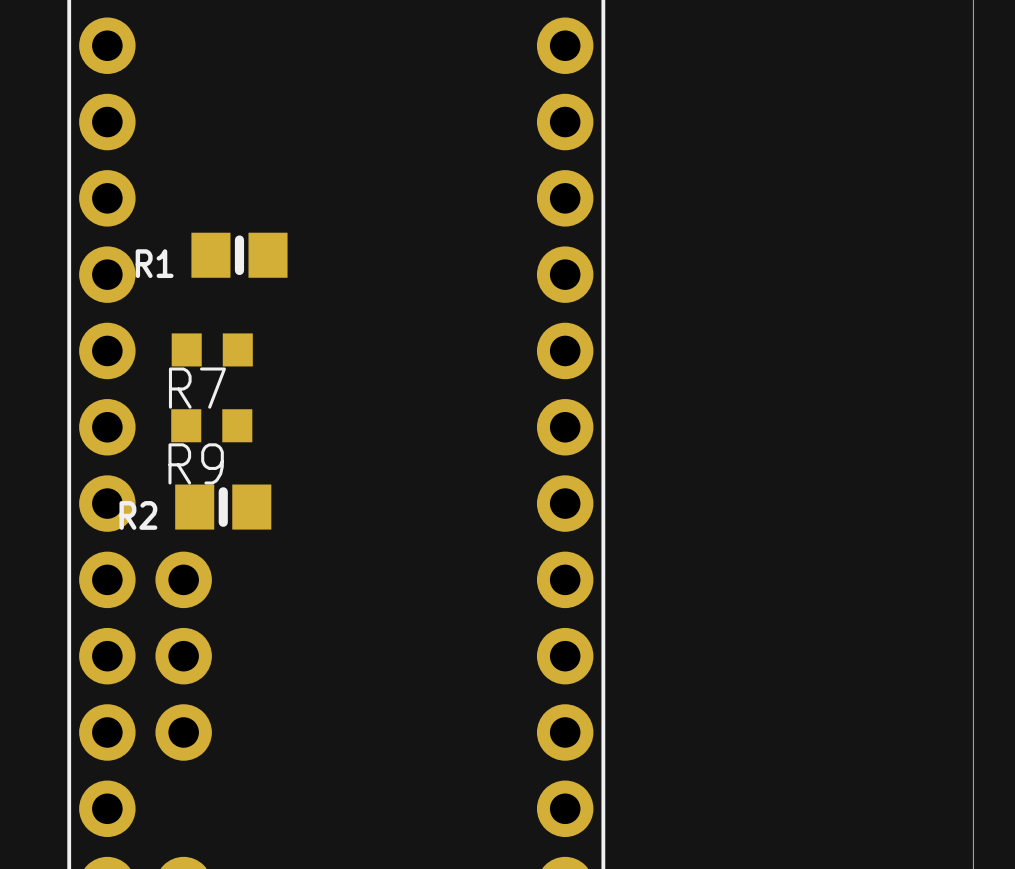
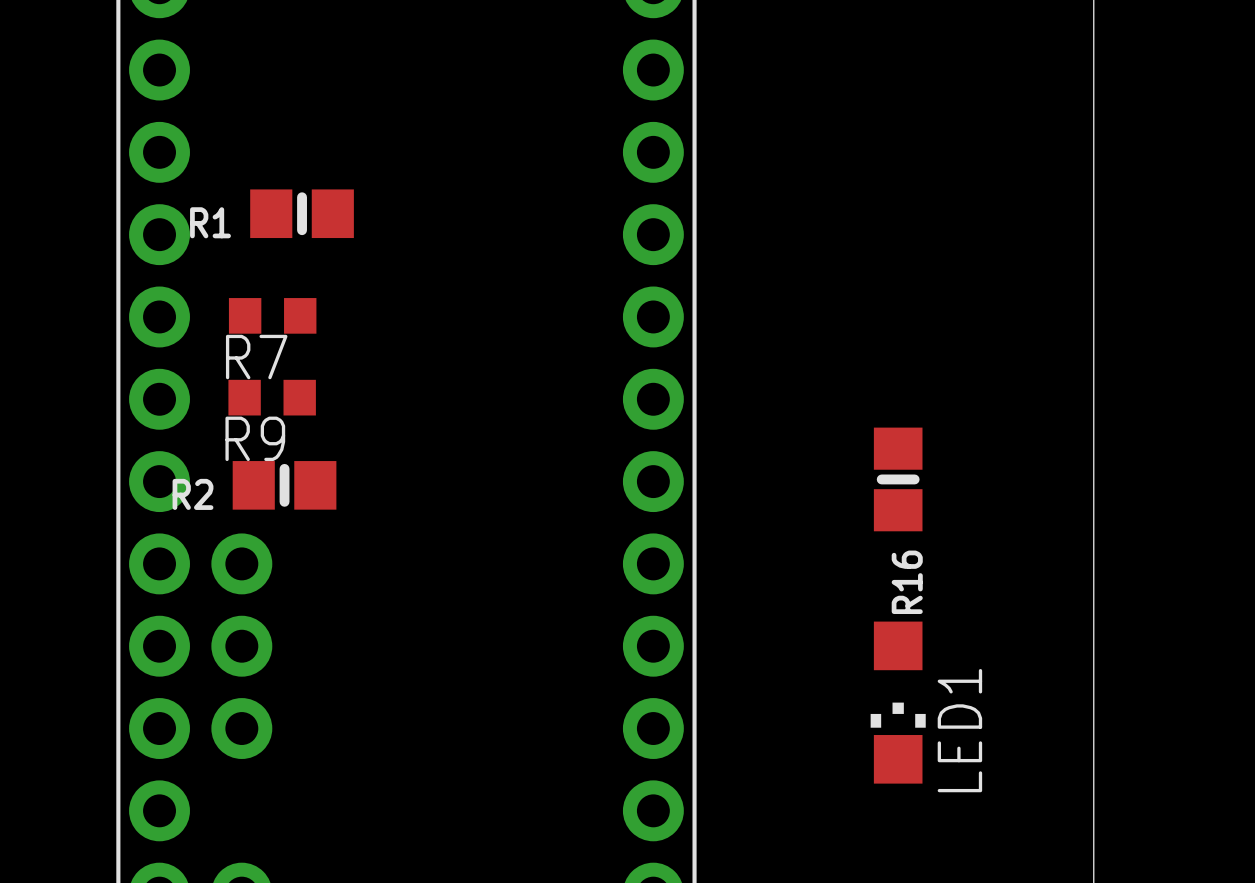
R16: none -> (898, 479)
LED1: none -> (898, 702)

